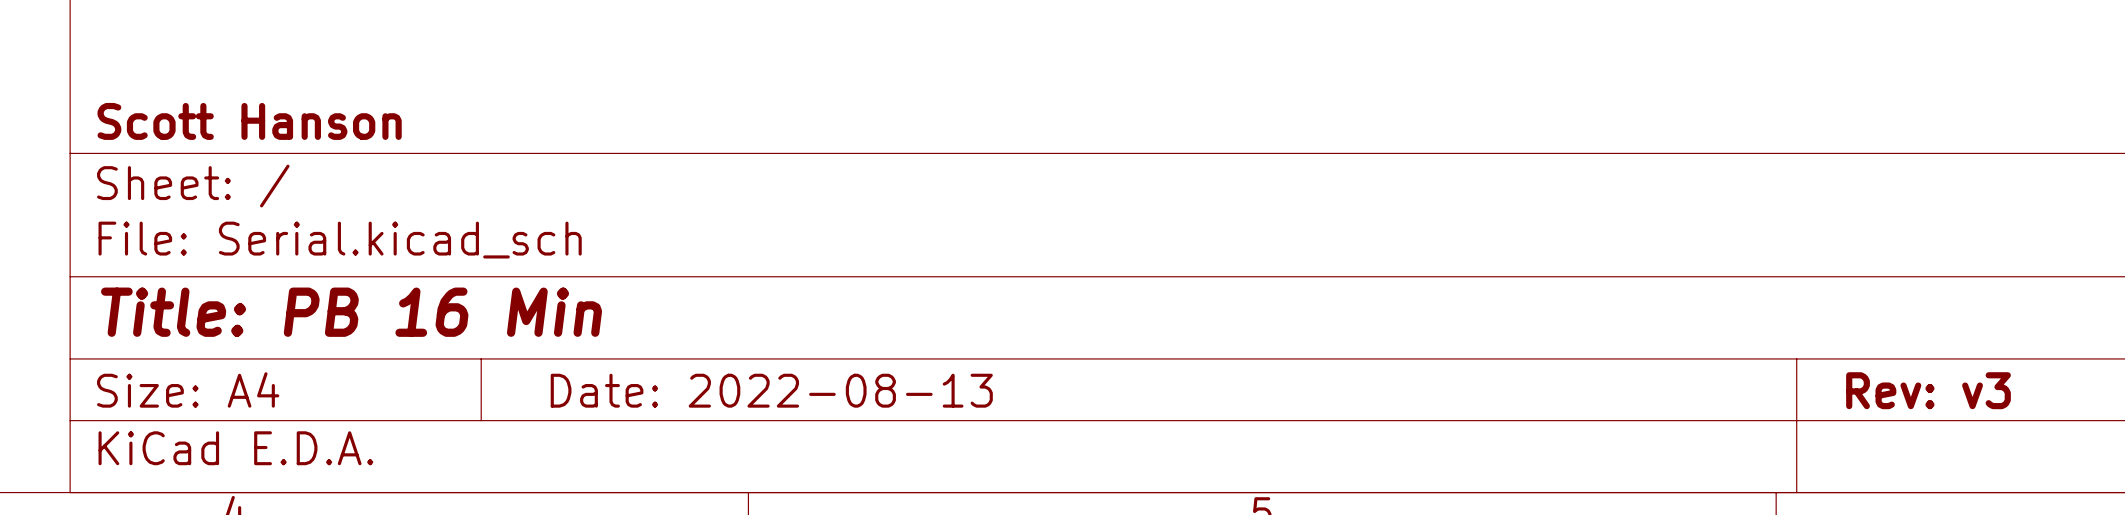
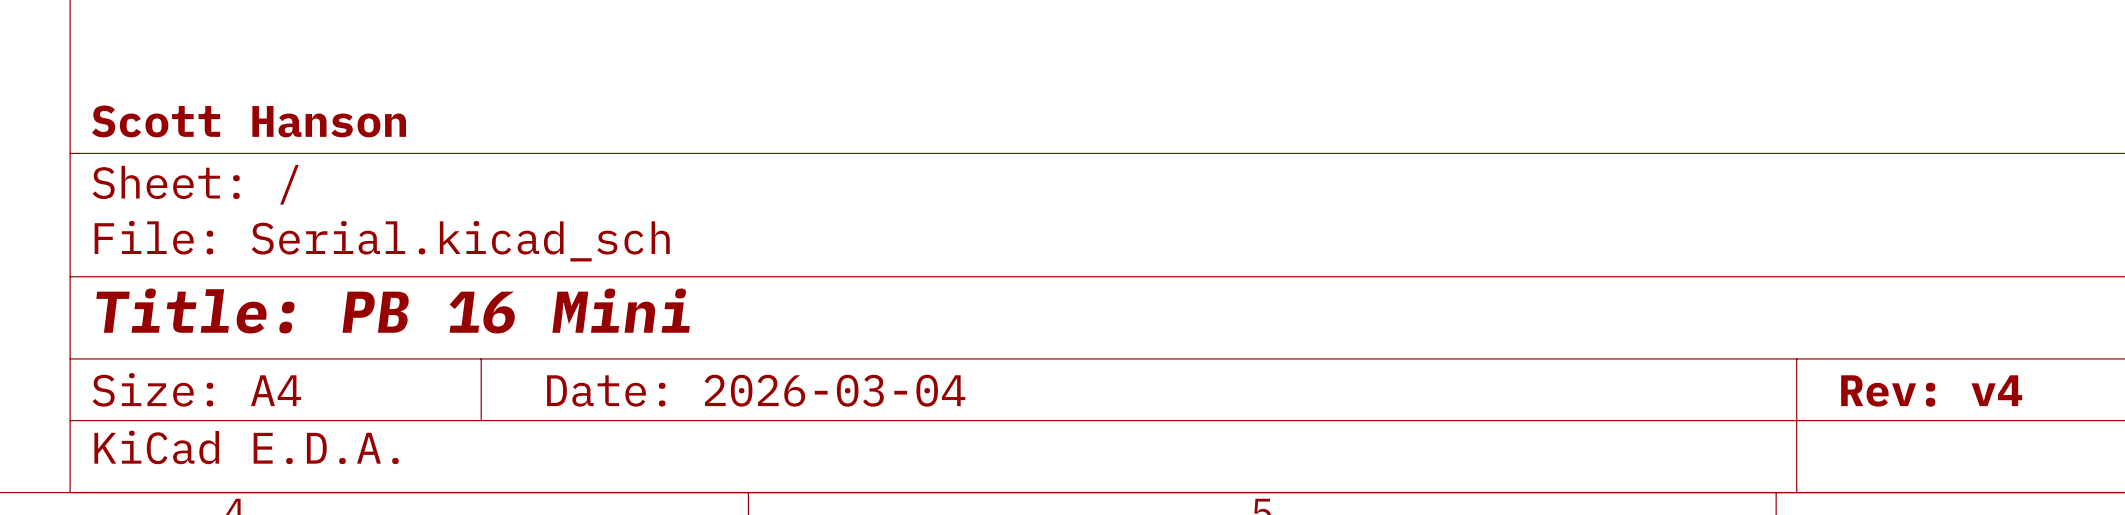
title block: Title: PB 16 Min (351, 312) -> Title: PB 16 Mini (393, 311)
title block: Date: 2022-08-13 (771, 390) -> Date: 2026-03-04 (756, 390)
title block: Rev: v3 (1928, 390) -> Rev: v4 (1931, 390)

